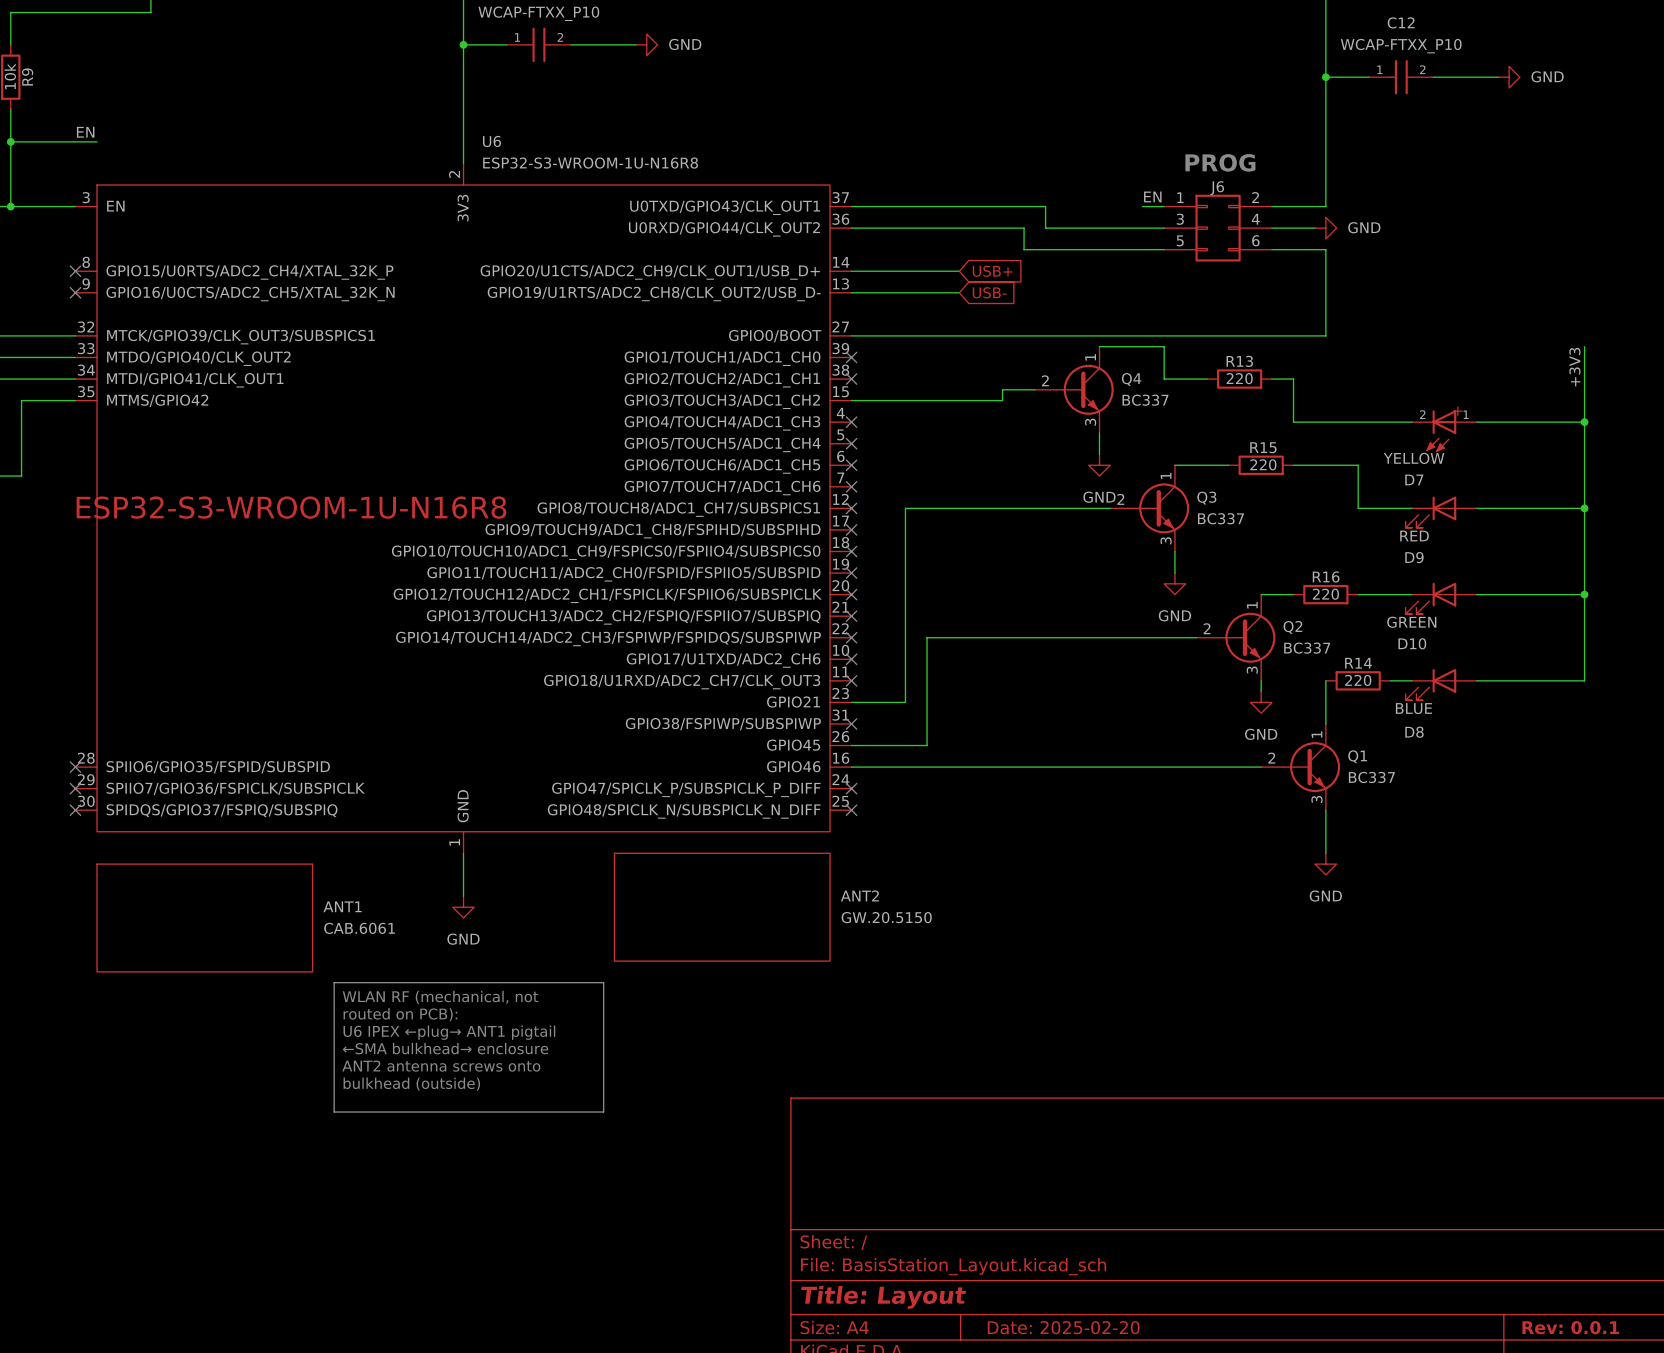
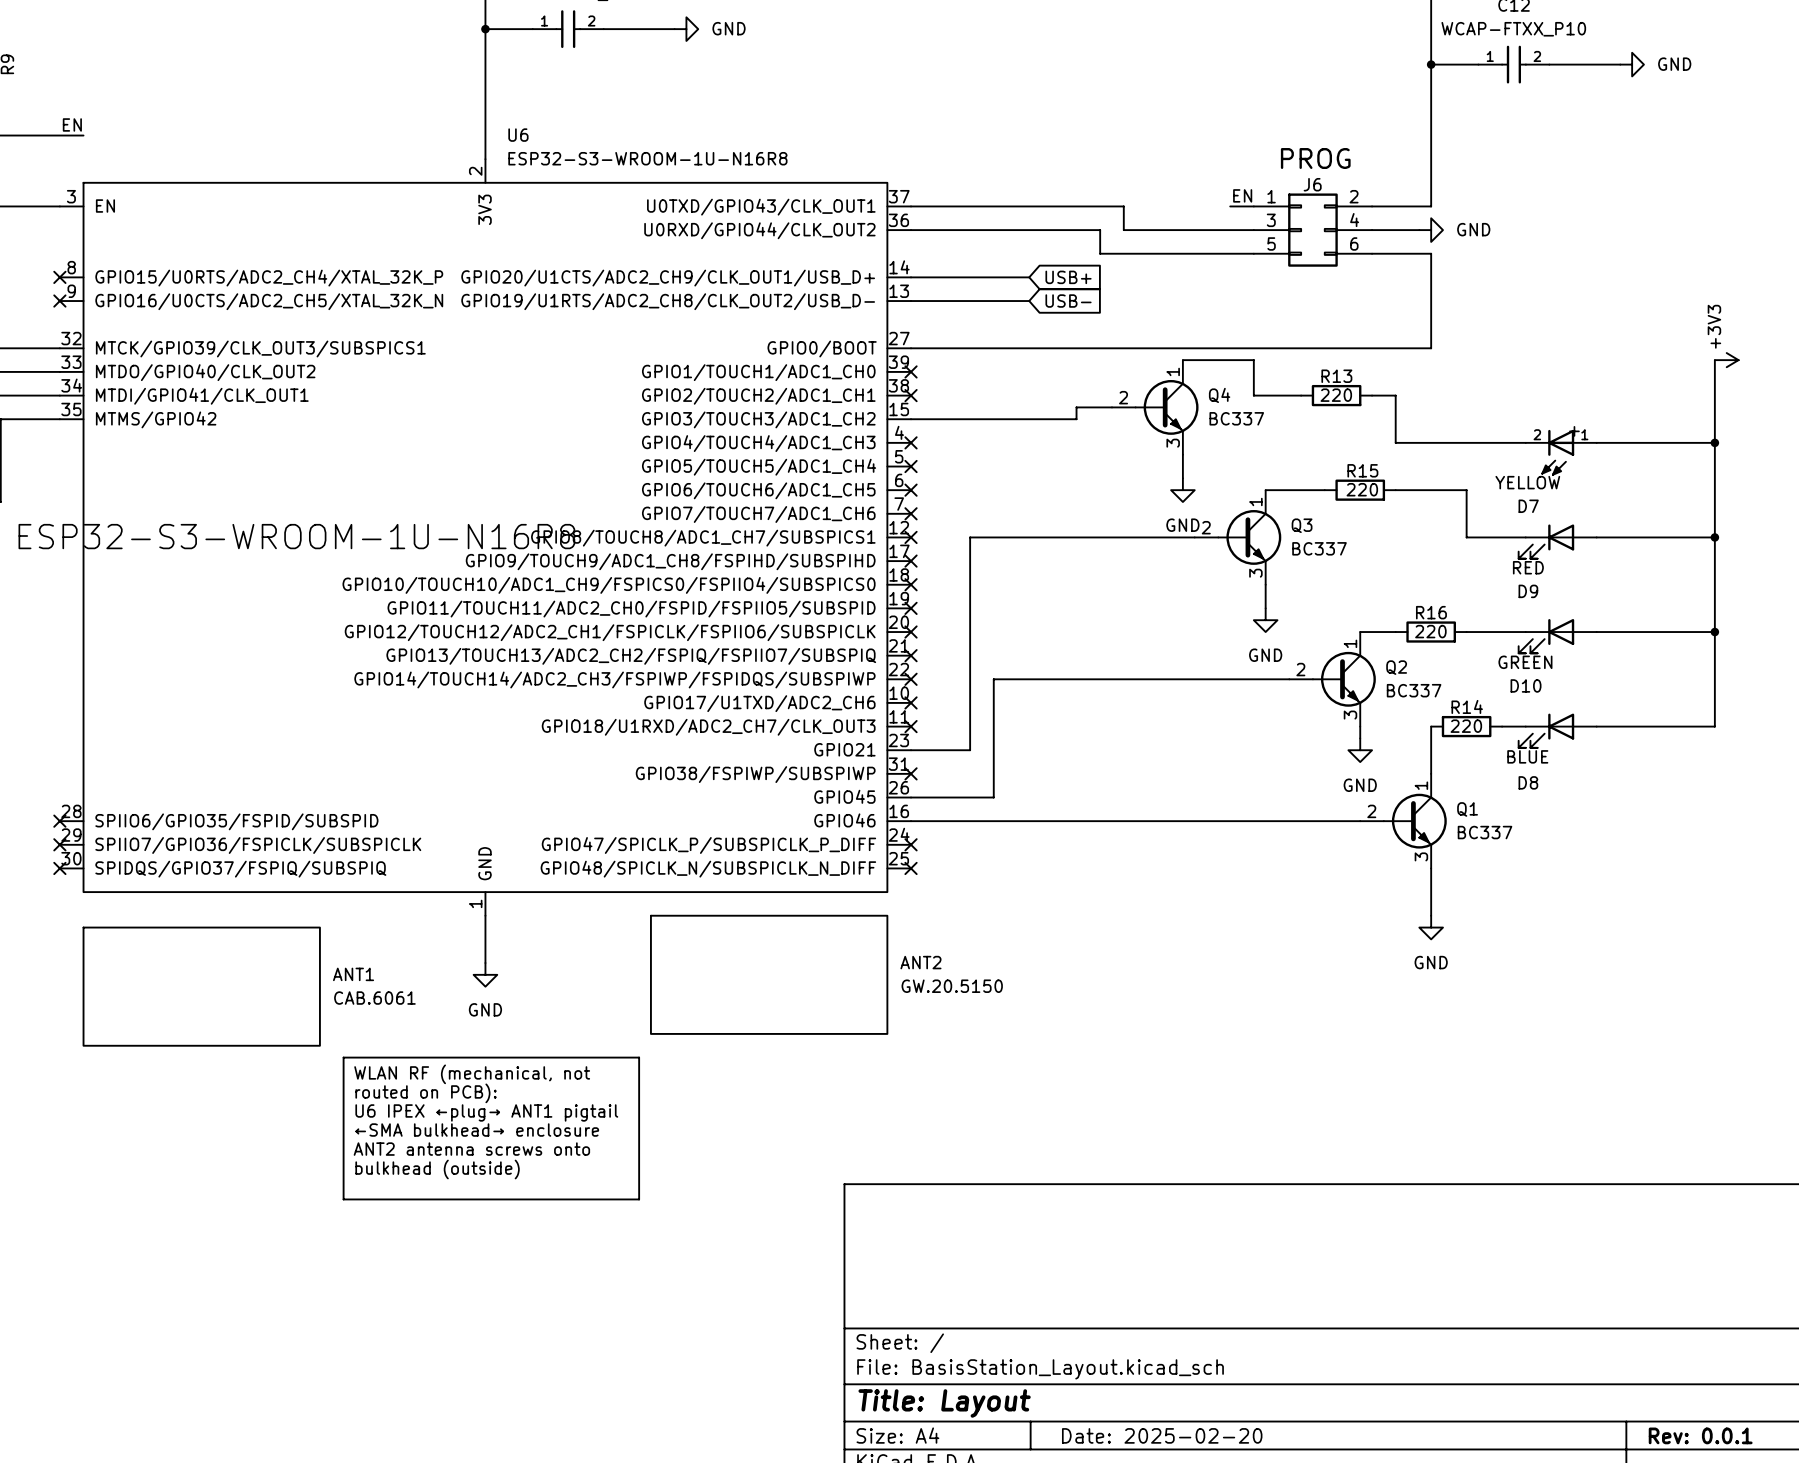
power symbol: none -> +3V3 (1726, 360)
label: +3V3 (1574, 367) -> none

